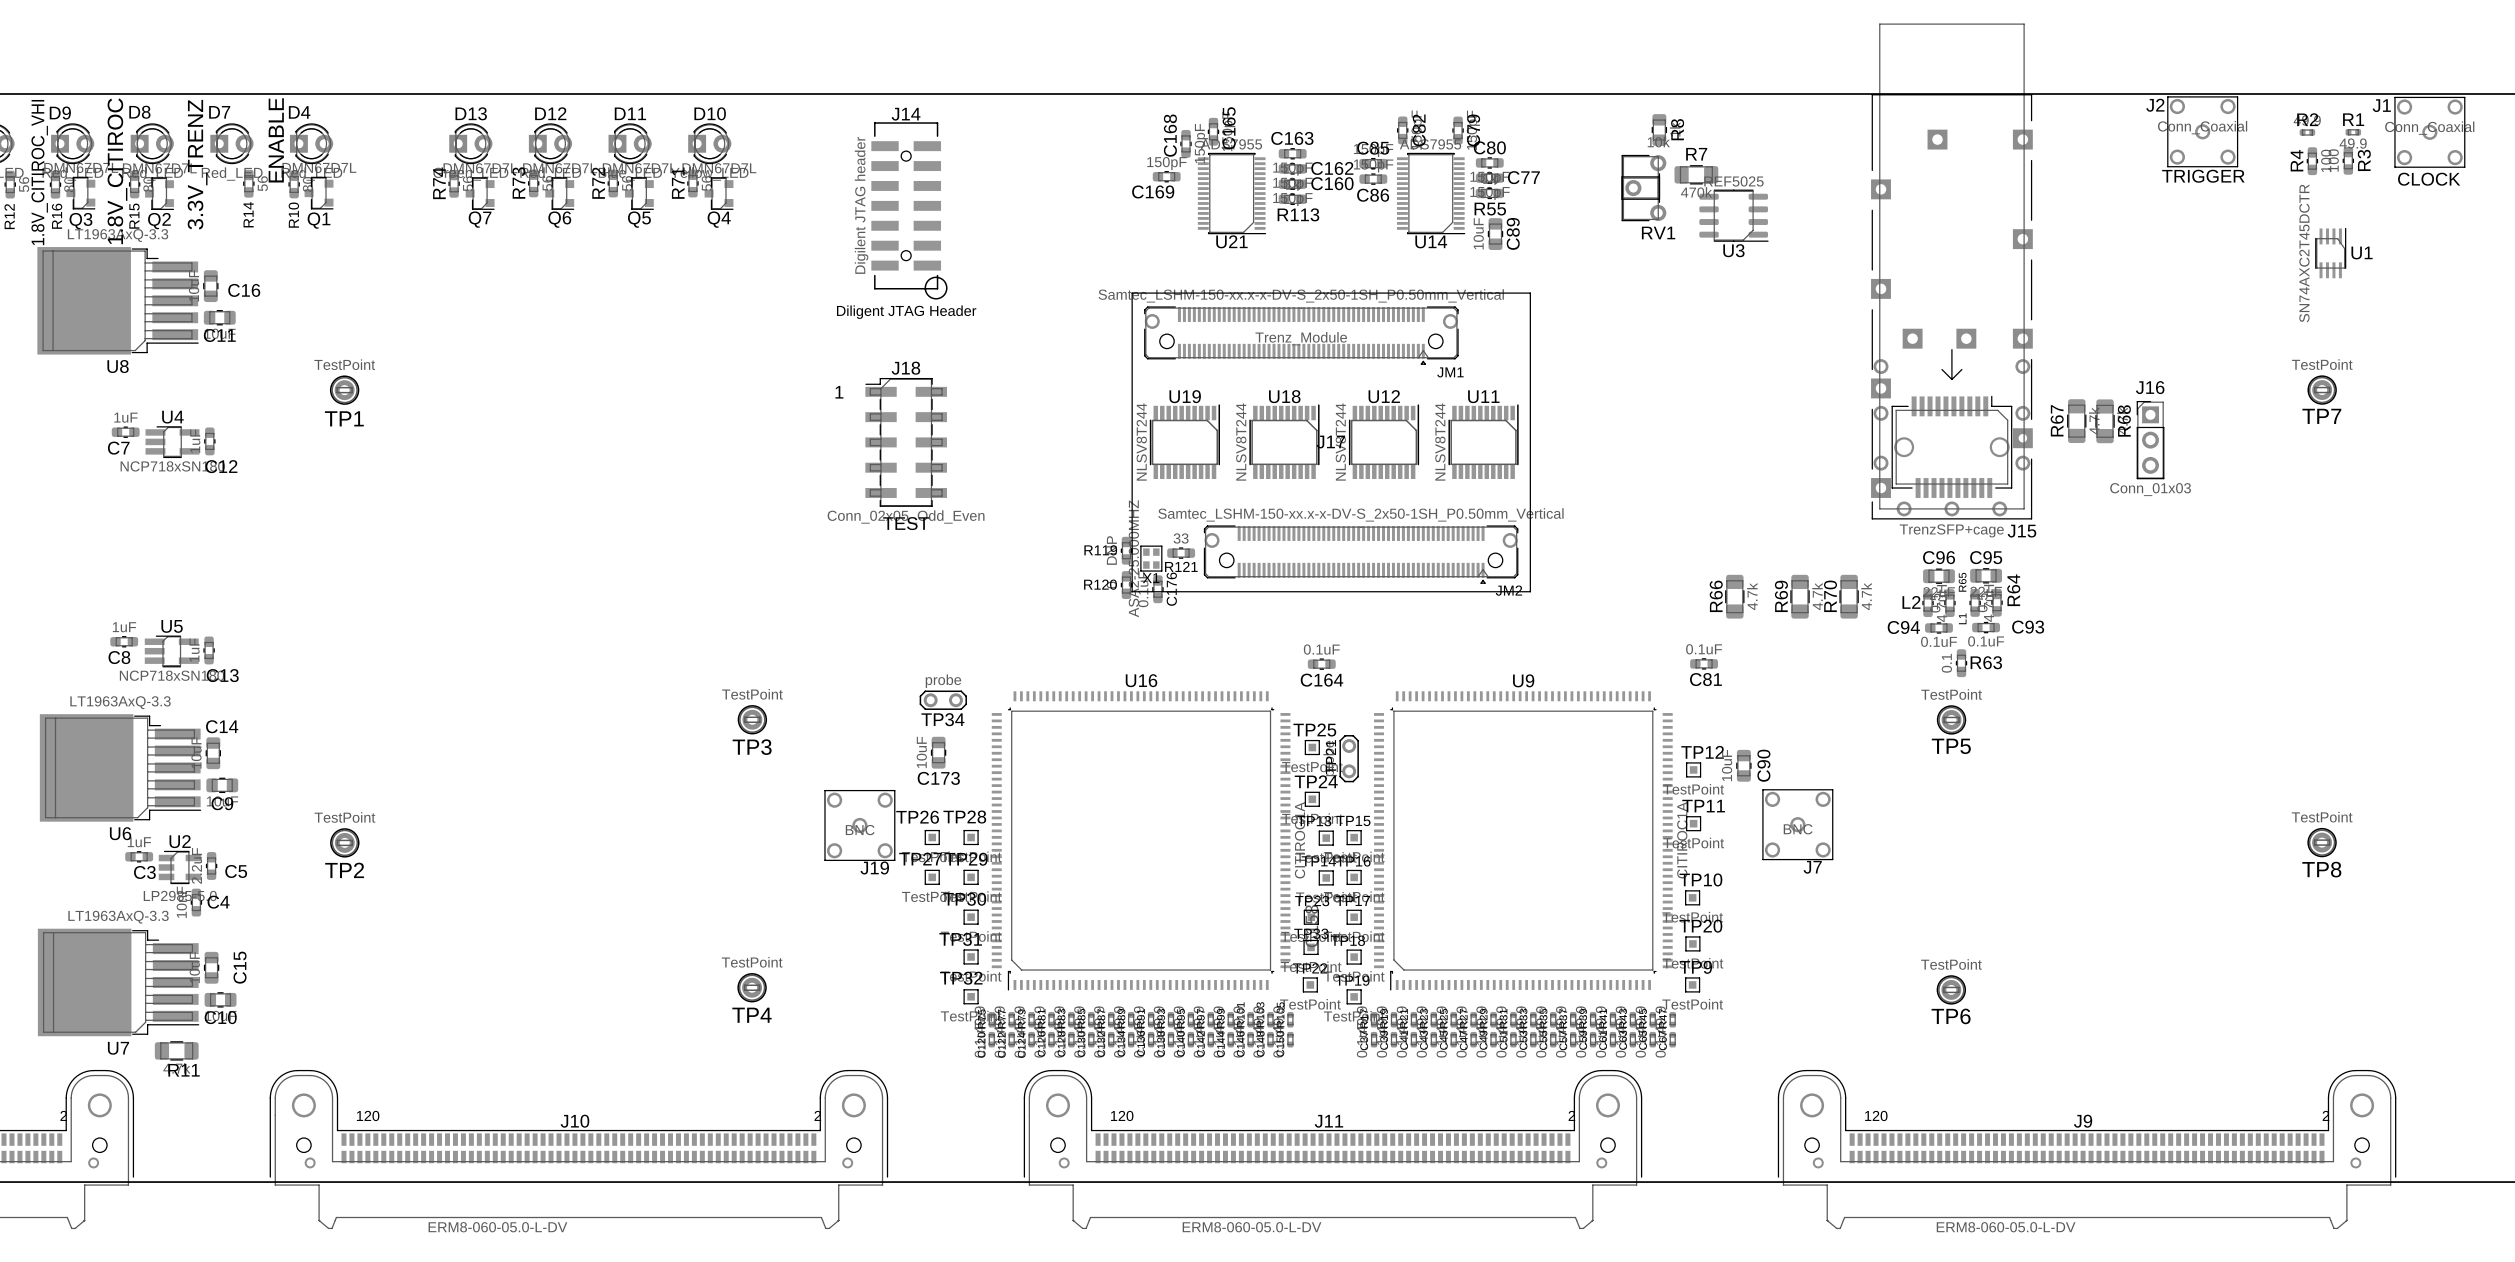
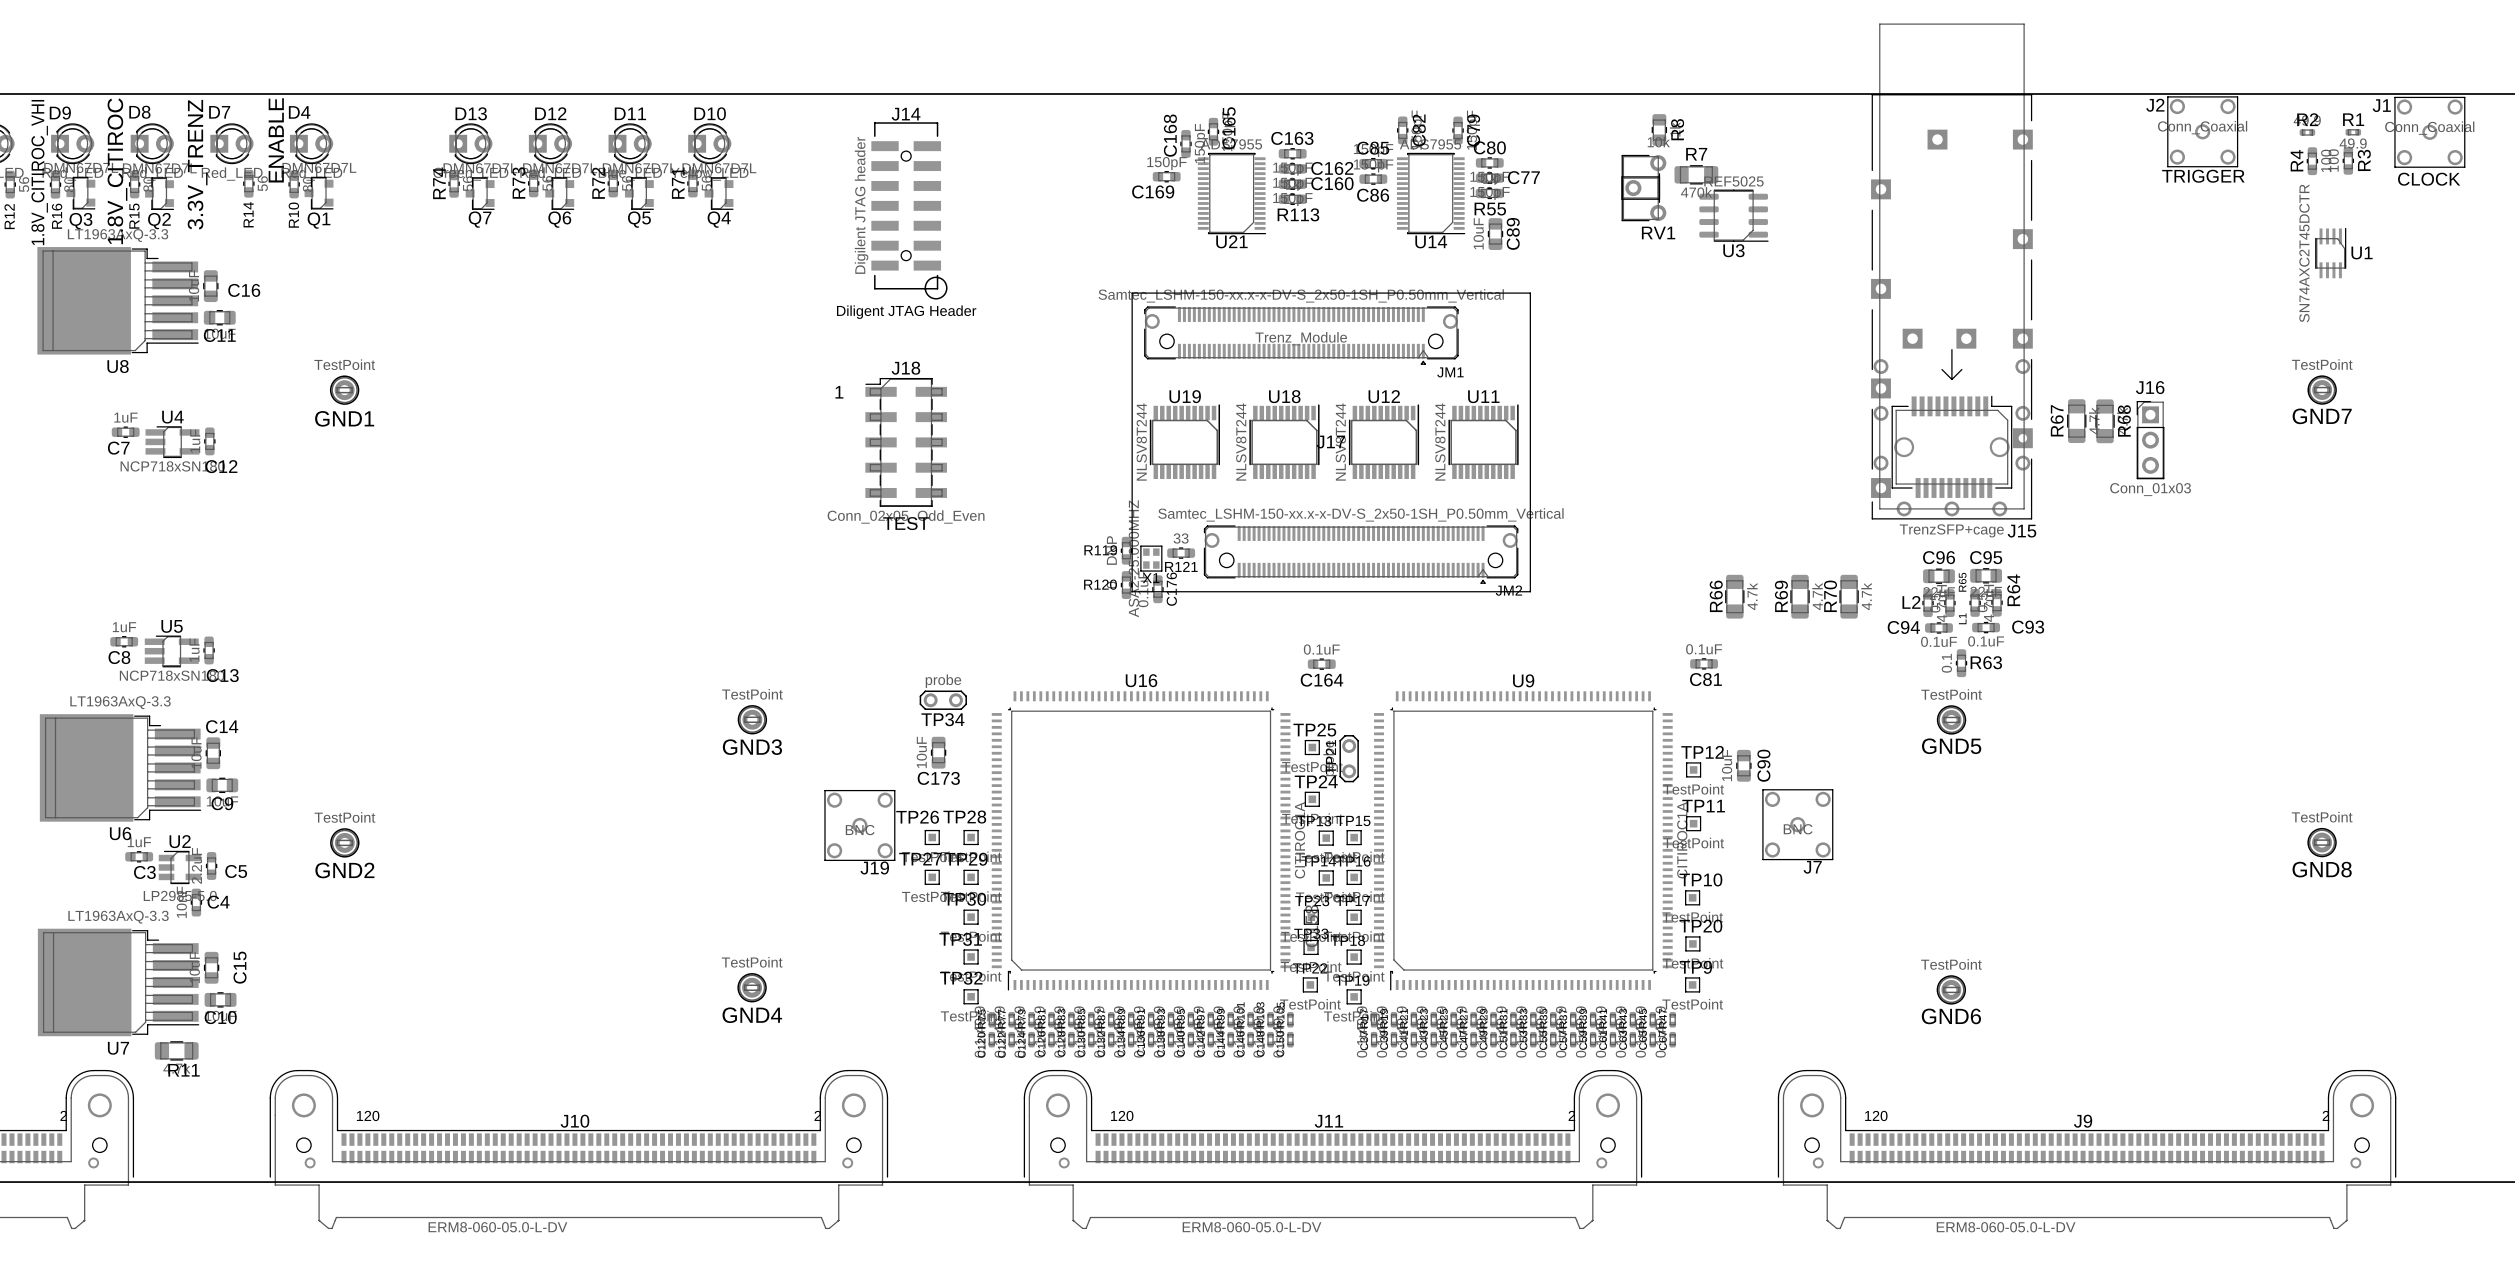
TP7 name: TP7 (2321, 416) -> GND7 (2322, 416)
TP1 name: TP1 (344, 418) -> GND1 (344, 418)
TP5 name: TP5 (1951, 746) -> GND5 (1951, 746)
TP3 name: TP3 (752, 747) -> GND3 (752, 747)
TP8 name: TP8 (2321, 869) -> GND8 (2322, 869)
TP2 name: TP2 (344, 870) -> GND2 (344, 870)
TP4 name: TP4 (752, 1015) -> GND4 (752, 1015)
TP6 name: TP6 (1951, 1016) -> GND6 (1951, 1016)

